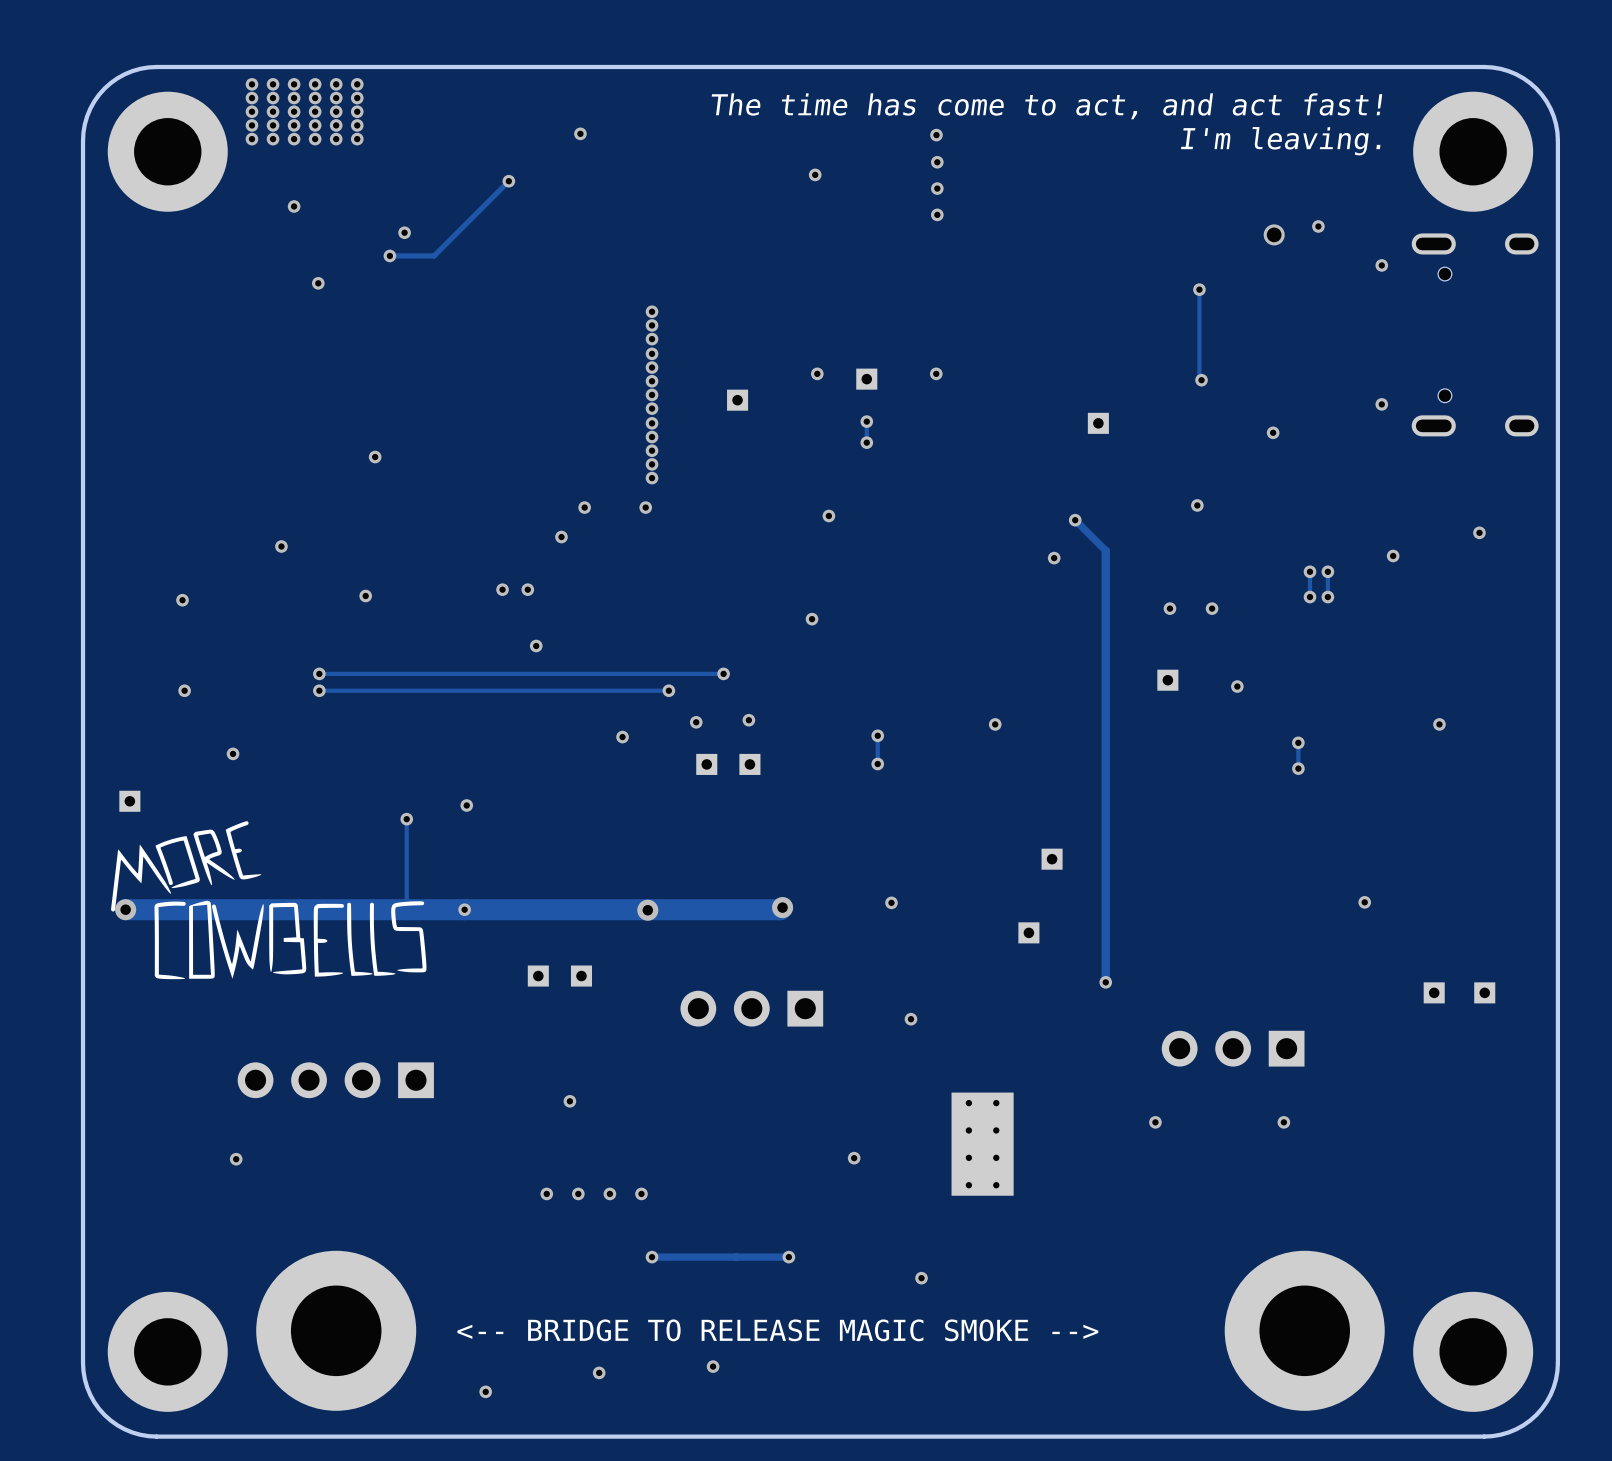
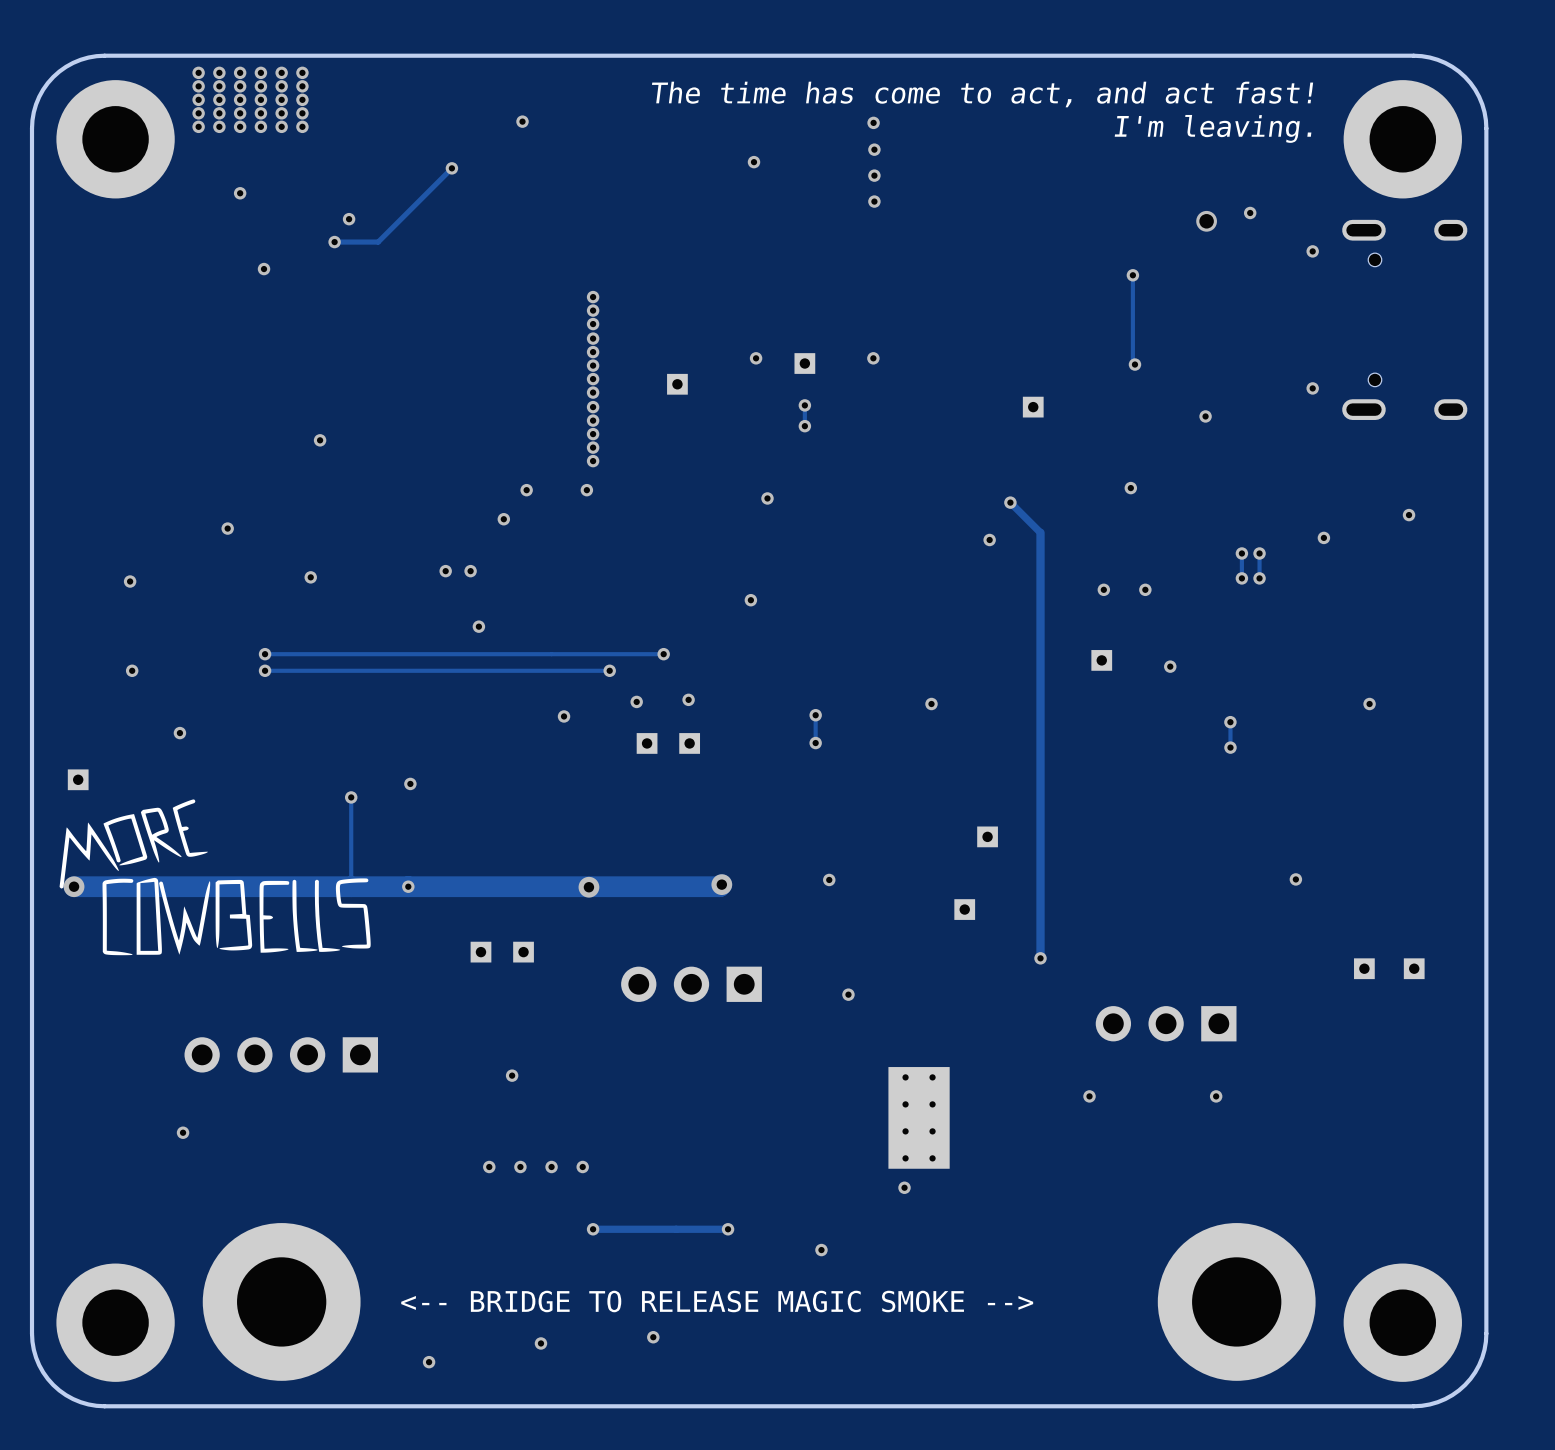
via: (854, 1158) -> none
via: none -> (904, 1187)
via position: (921, 1278) -> (821, 1250)

